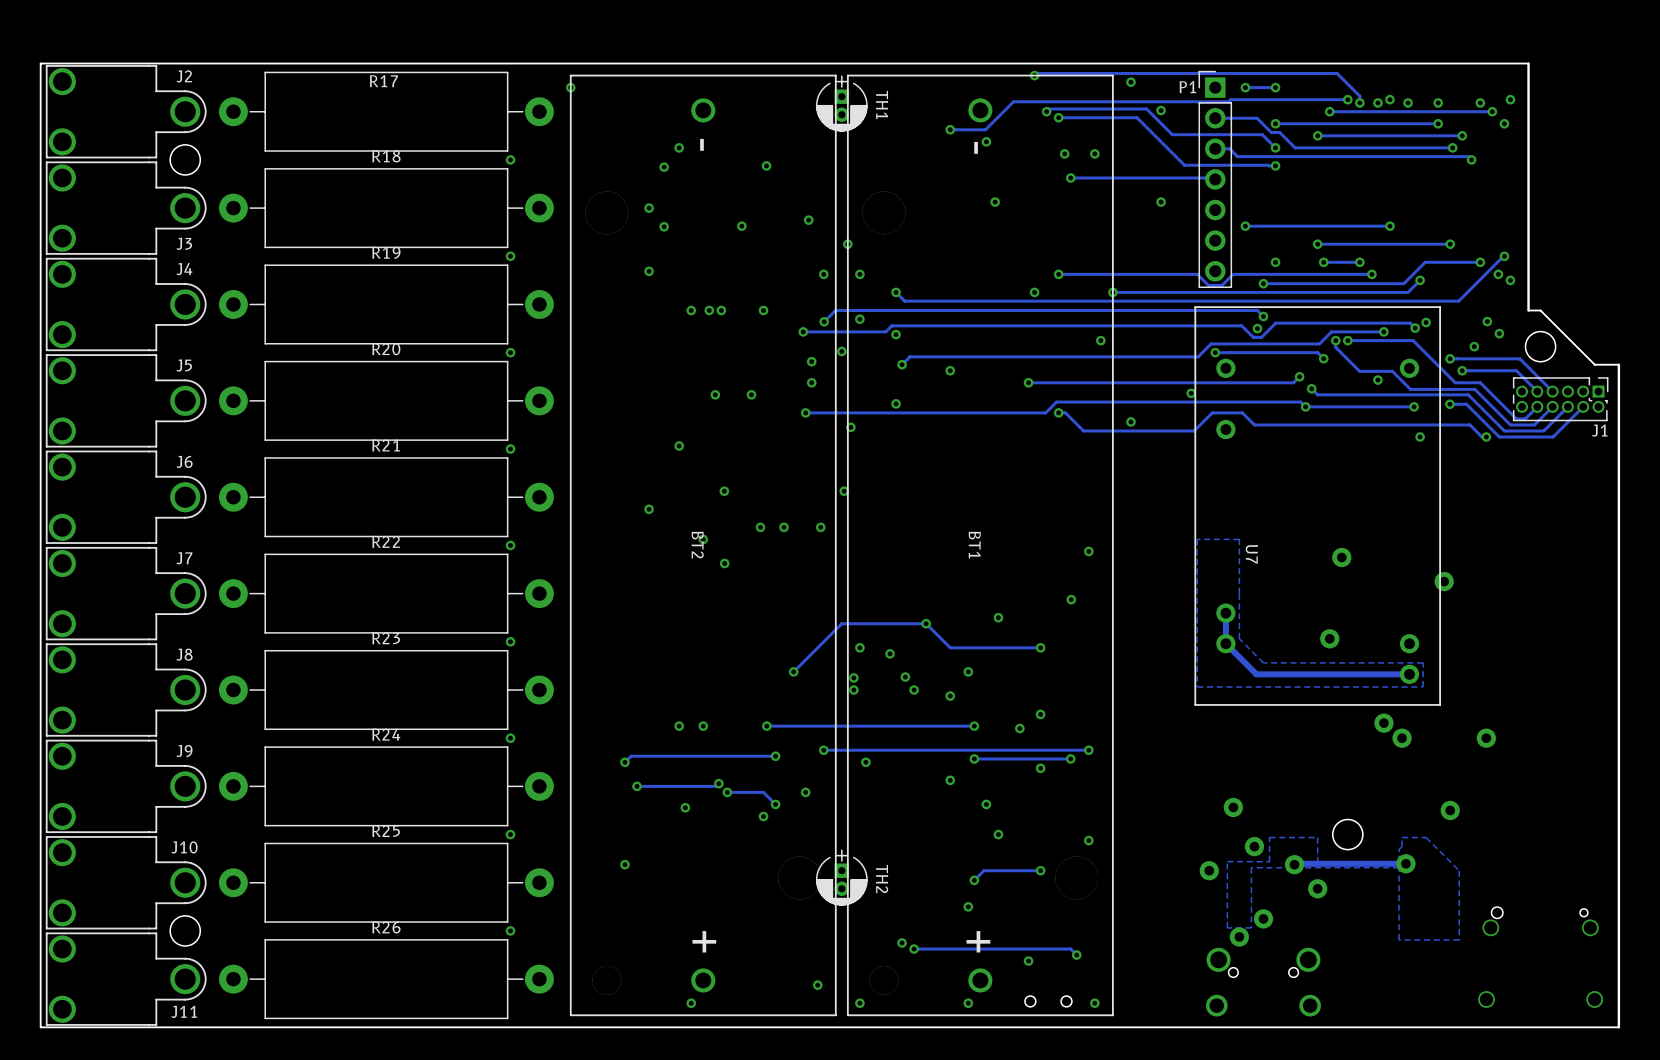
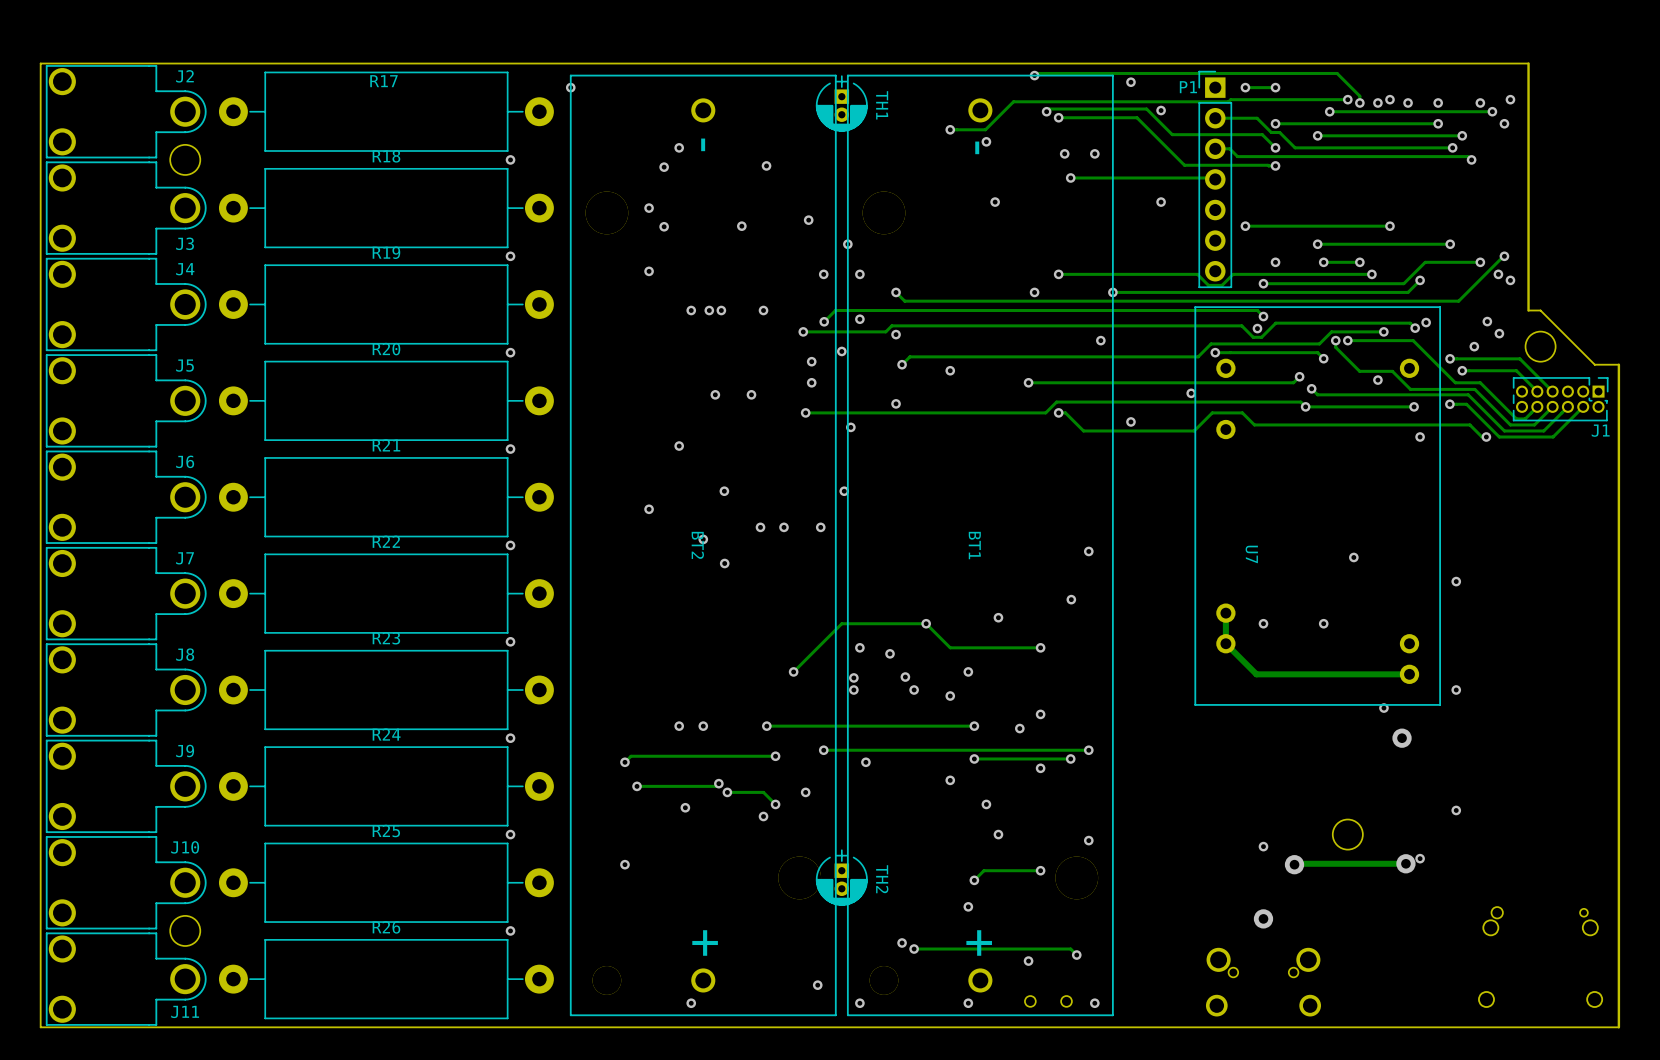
zone outline: (1239, 539) (1239, 638) (1263, 662) (1423, 662) (1423, 686) (1197, 686) (1197, 539) (1239, 539) -> none
via size: [1332, 547, 1352, 568] -> [1349, 552, 1359, 563]
via size: [1434, 571, 1454, 592] -> [1451, 576, 1462, 587]
via: none -> (1263, 623)
via: none -> (1323, 623)
via: (1329, 638) -> none
via: none -> (1456, 690)
via: none -> (1383, 708)
via: (1383, 723) -> none
via: (1486, 738) -> none
via size: [1440, 800, 1460, 821] -> [1451, 805, 1462, 816]
via: (1233, 807) -> none
via size: [1244, 836, 1265, 857] -> [1258, 841, 1269, 852]
zone outline: (1426, 837) (1402, 837) (1399, 861) (1317, 861) (1317, 837) (1269, 837) (1269, 861) (1227, 861) (1227, 927) (1251, 927) (1251, 867) (1399, 867) (1399, 939) (1459, 939) (1459, 870) (1426, 837) -> none
via: none -> (1420, 858)
via: (1209, 870) -> none
via: (1317, 888) -> none
via: (1239, 936) -> none

